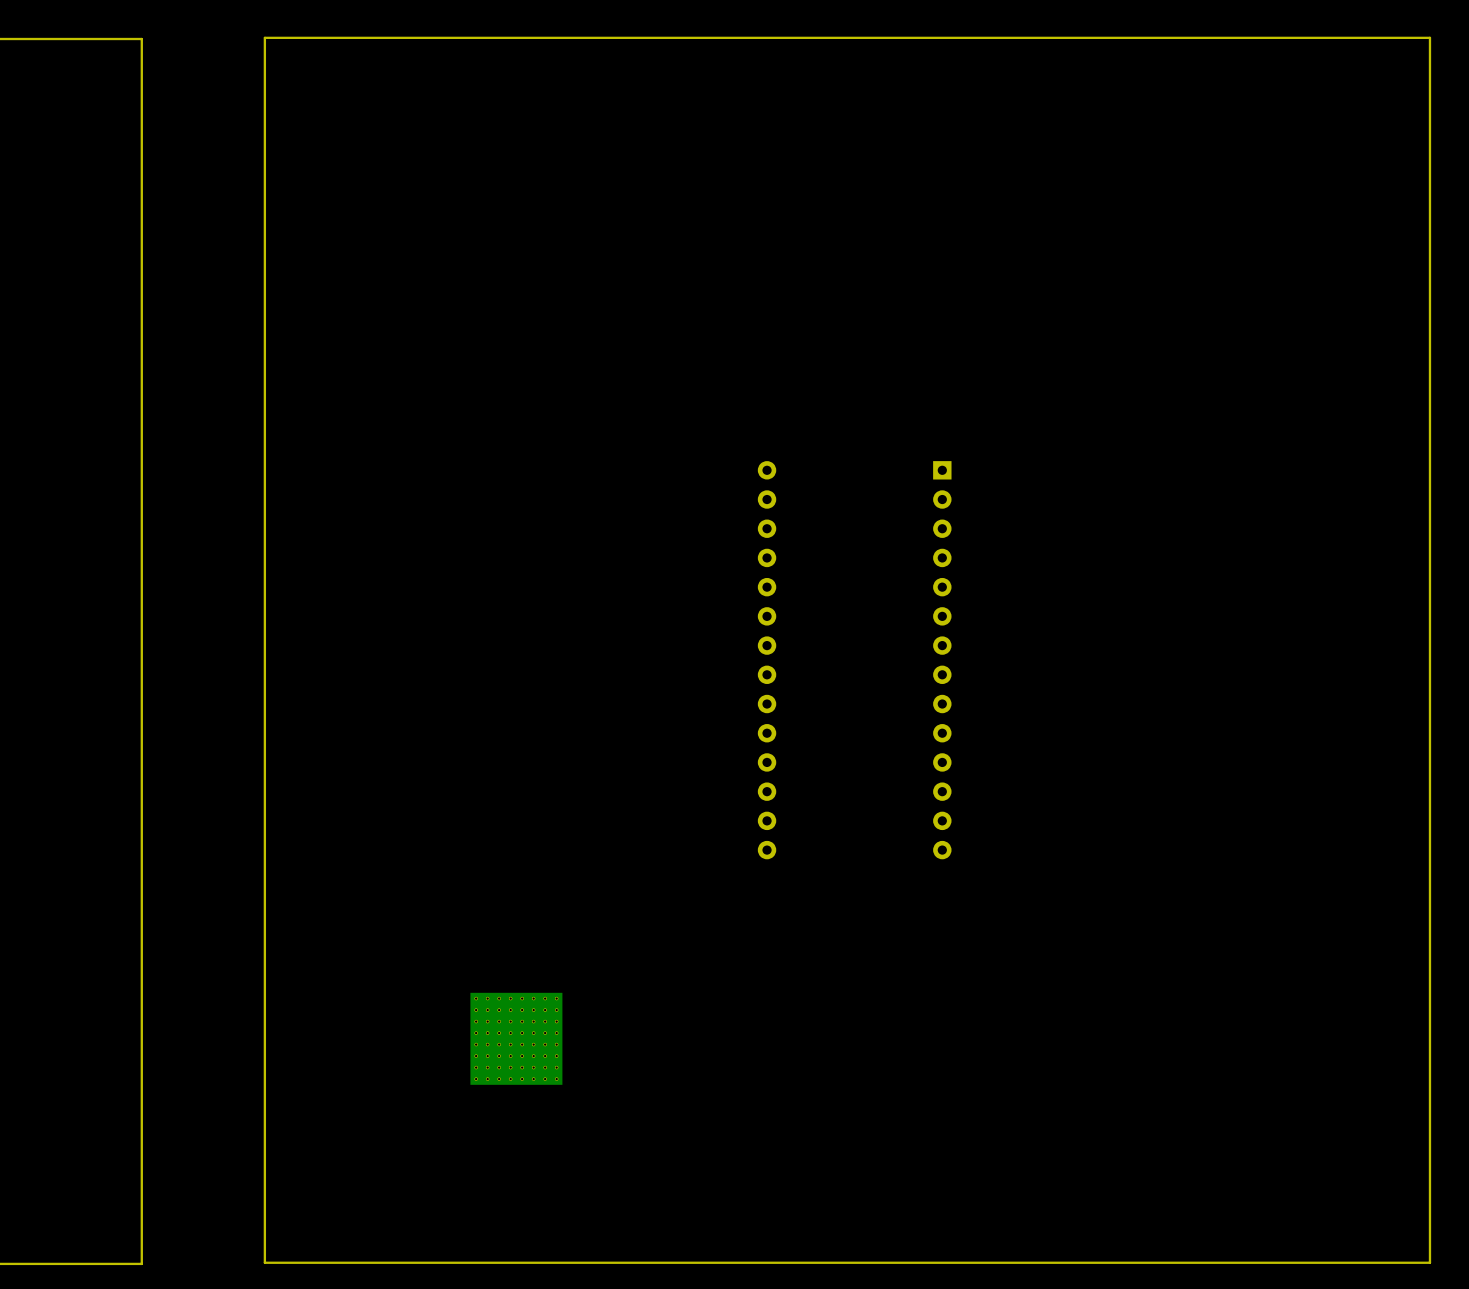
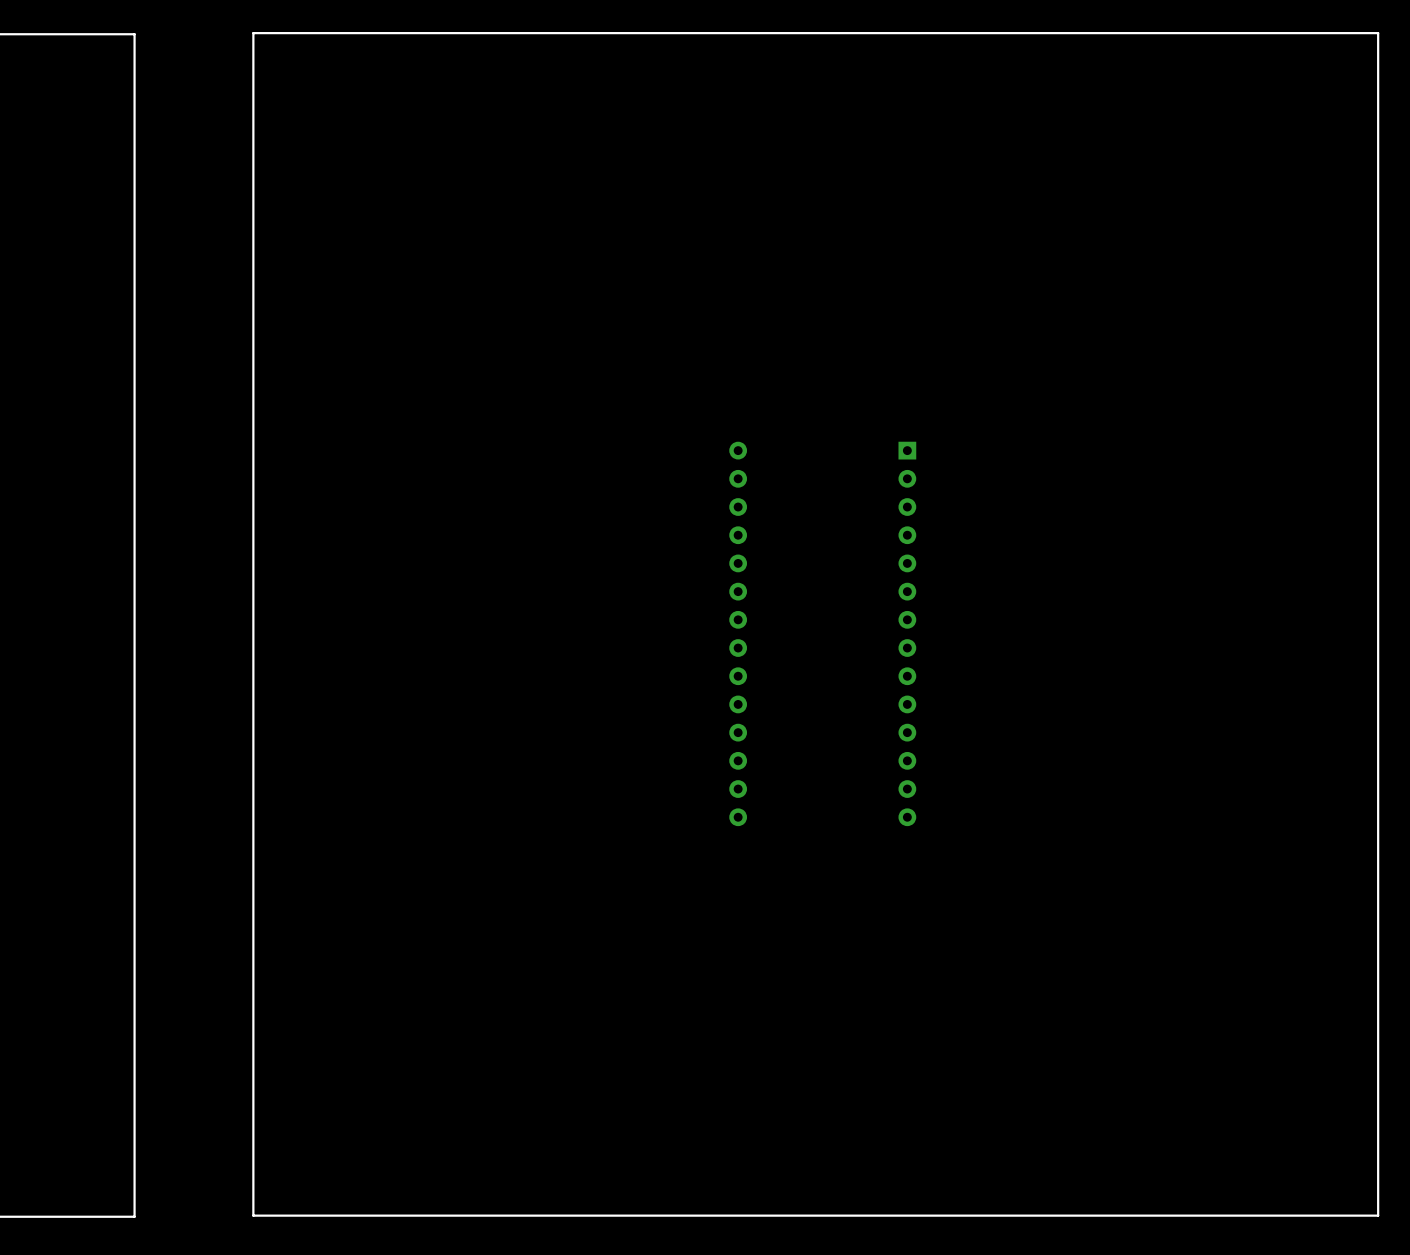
part: (516, 1038) -> none

